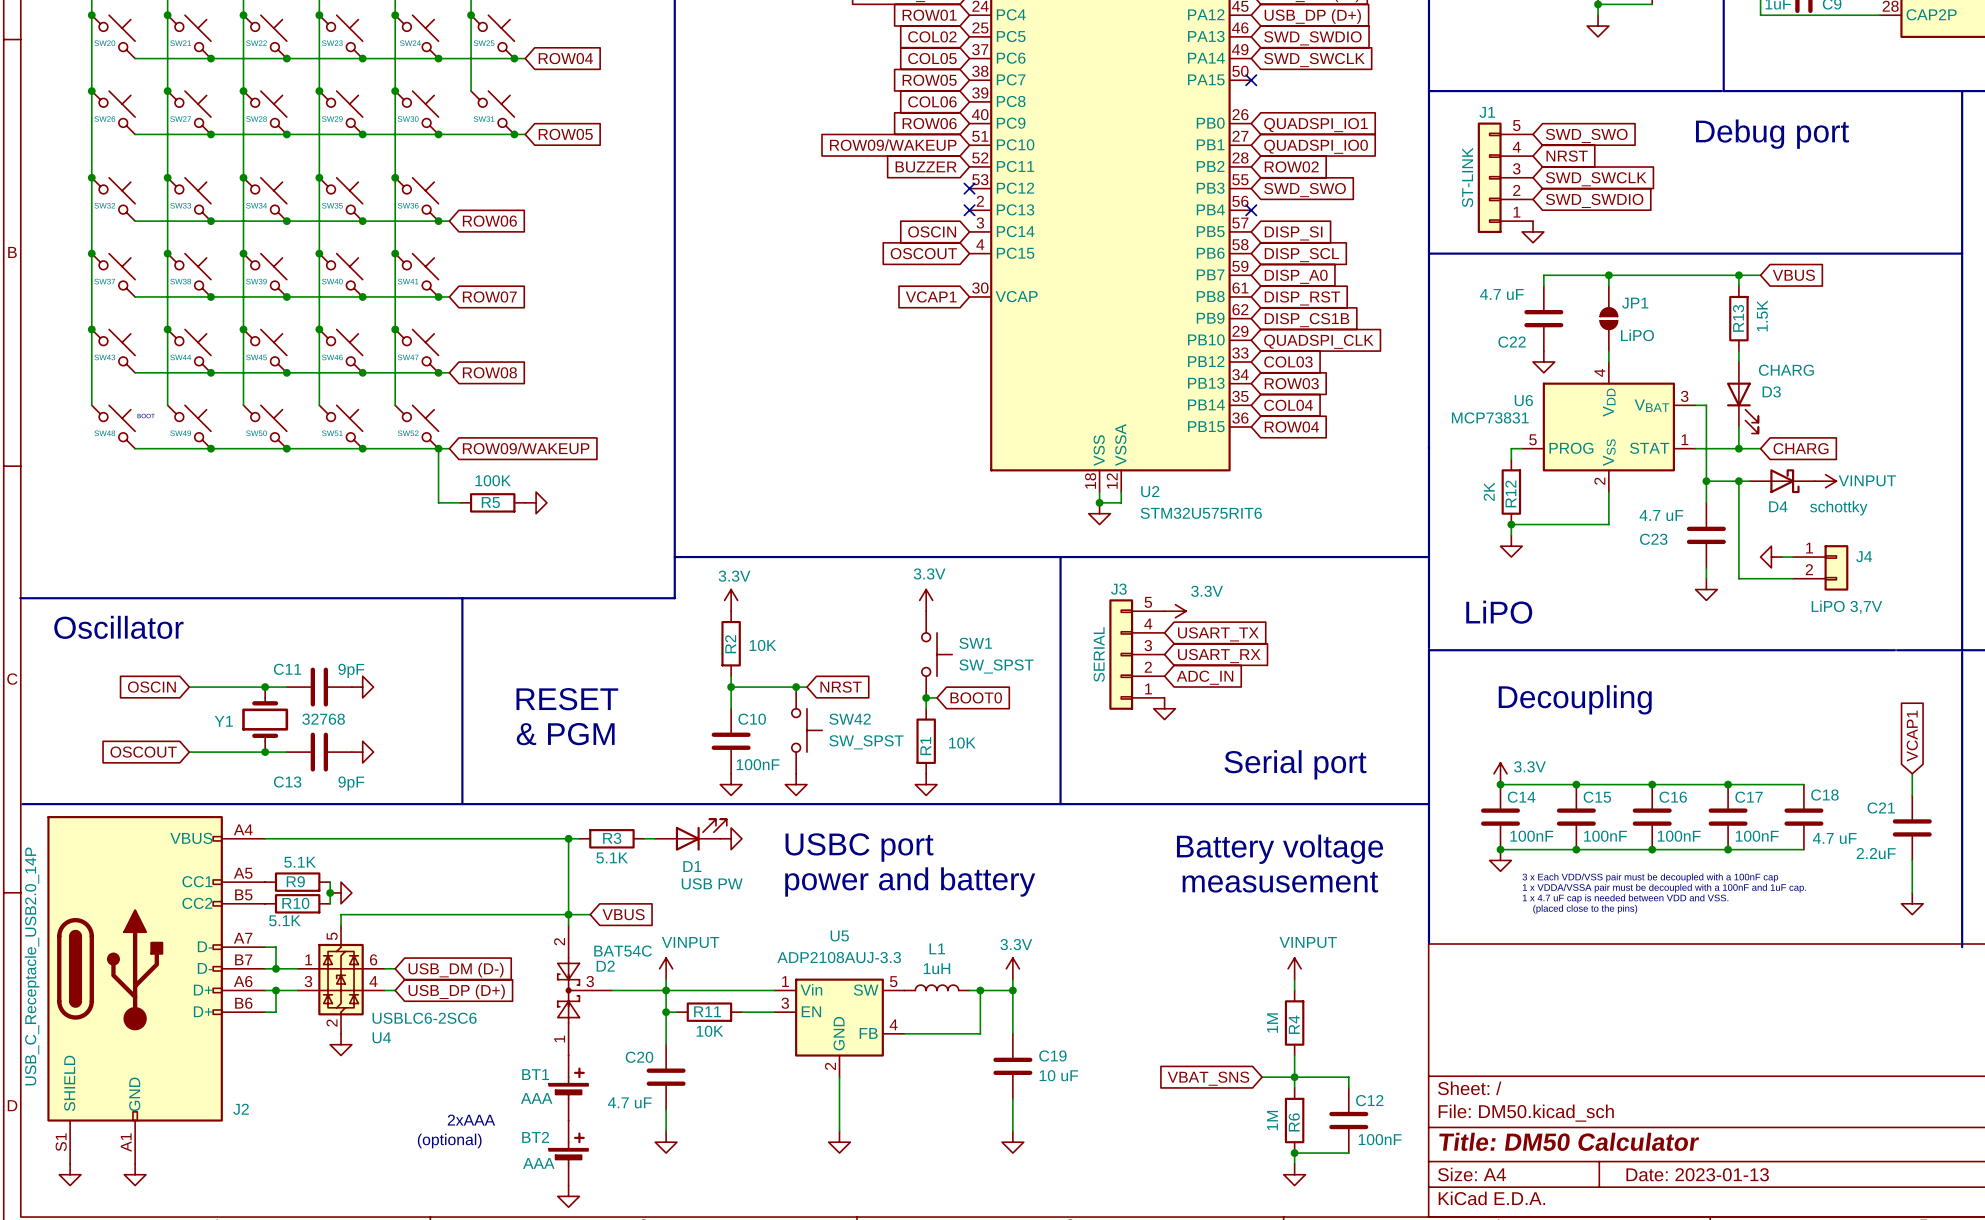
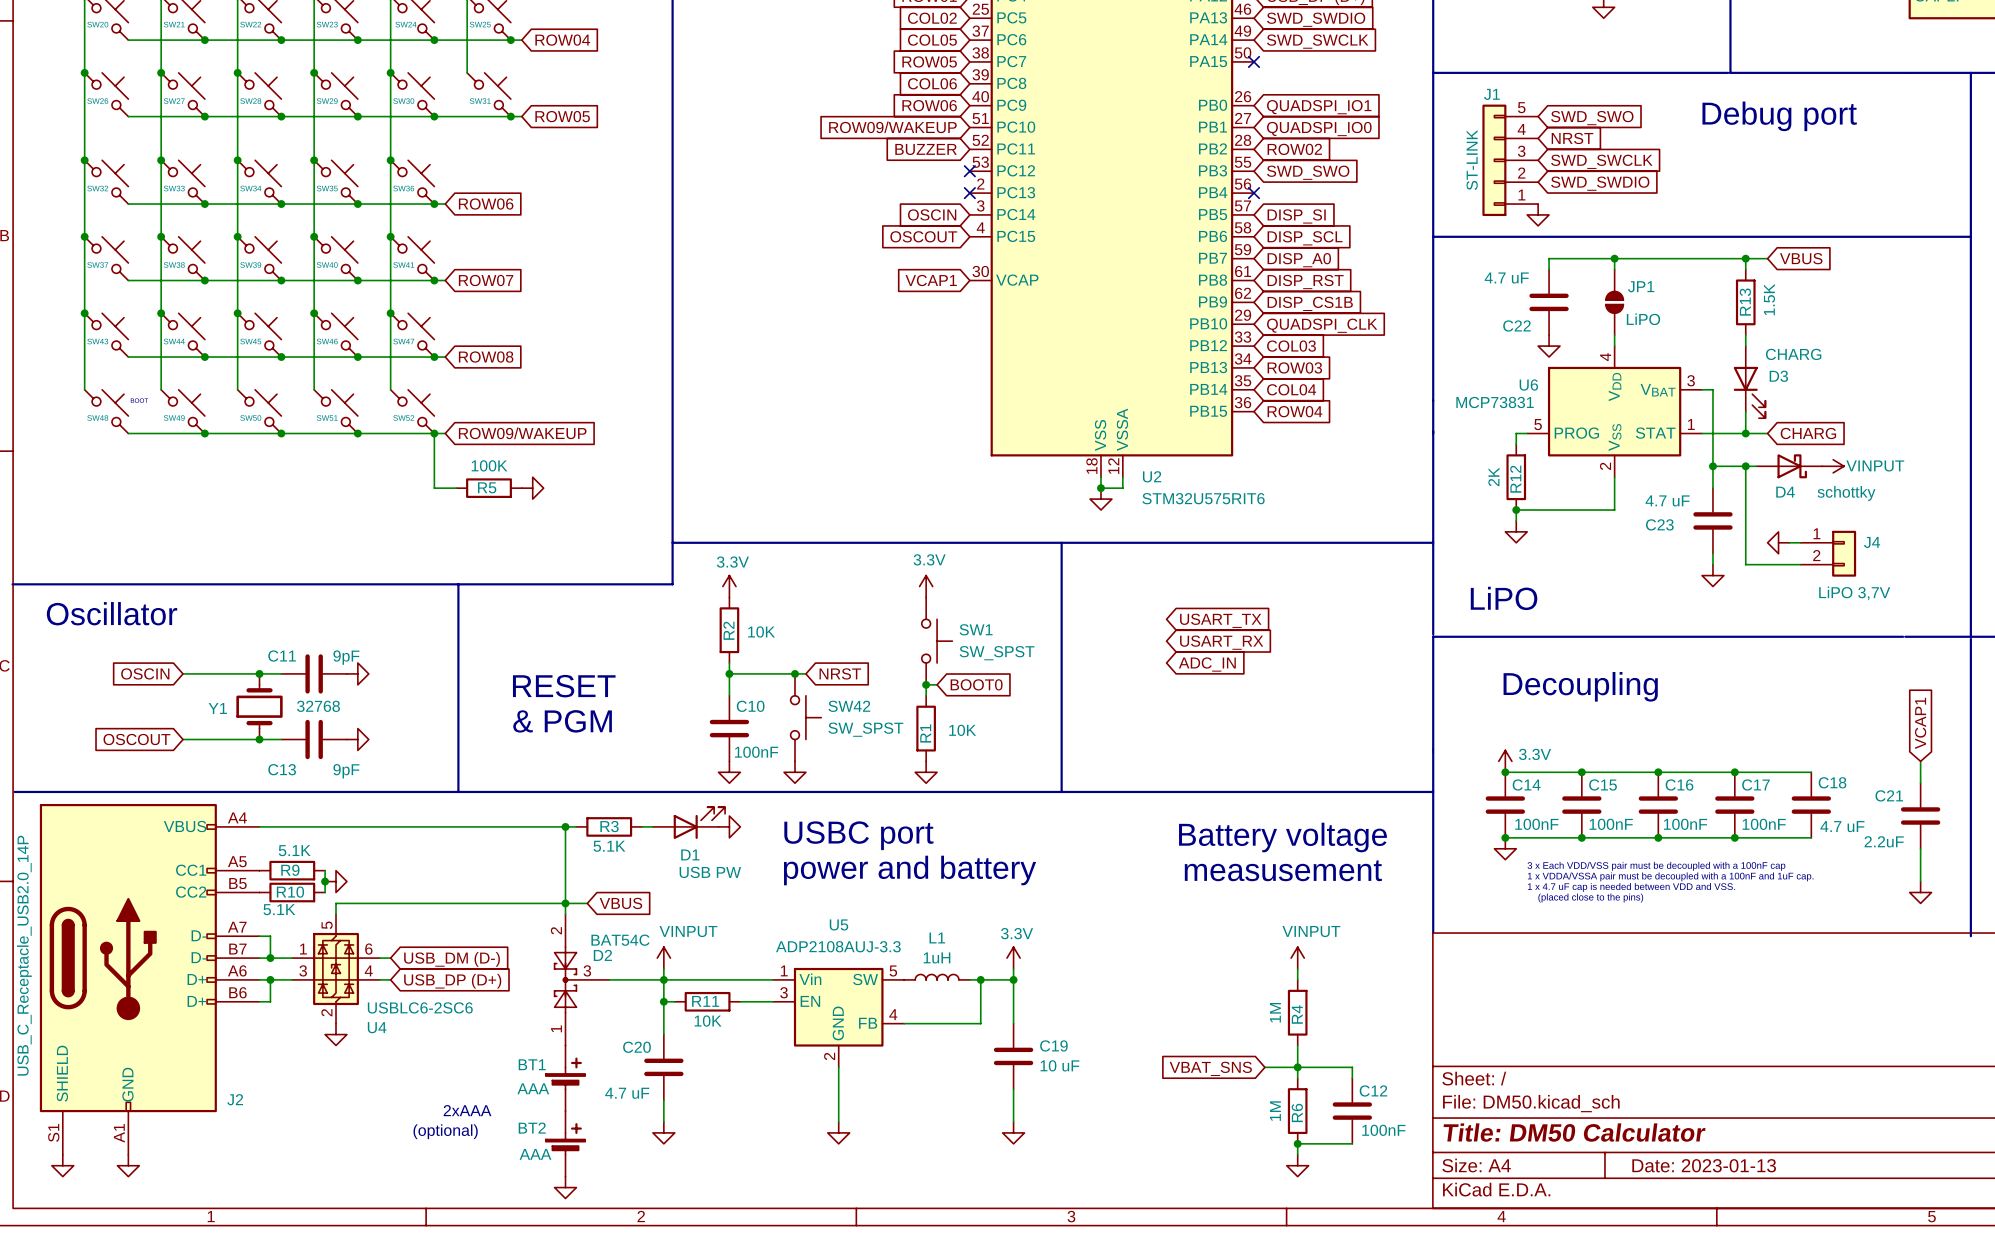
power symbol: 3.3V (1175, 611) -> none
J3: SERIAL (1136, 654) -> none
power symbol: (1164, 708) -> none
text: Serial port (1295, 764) -> none

